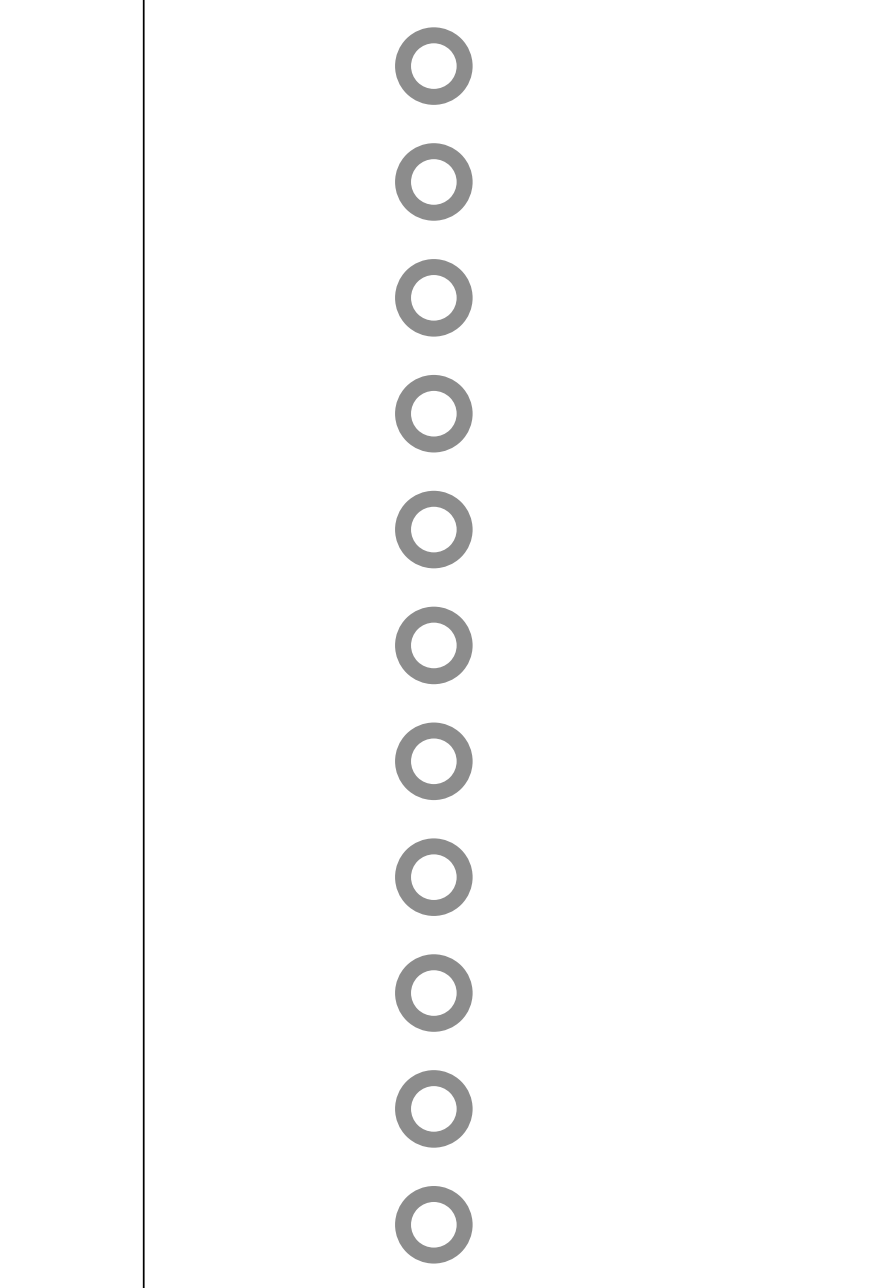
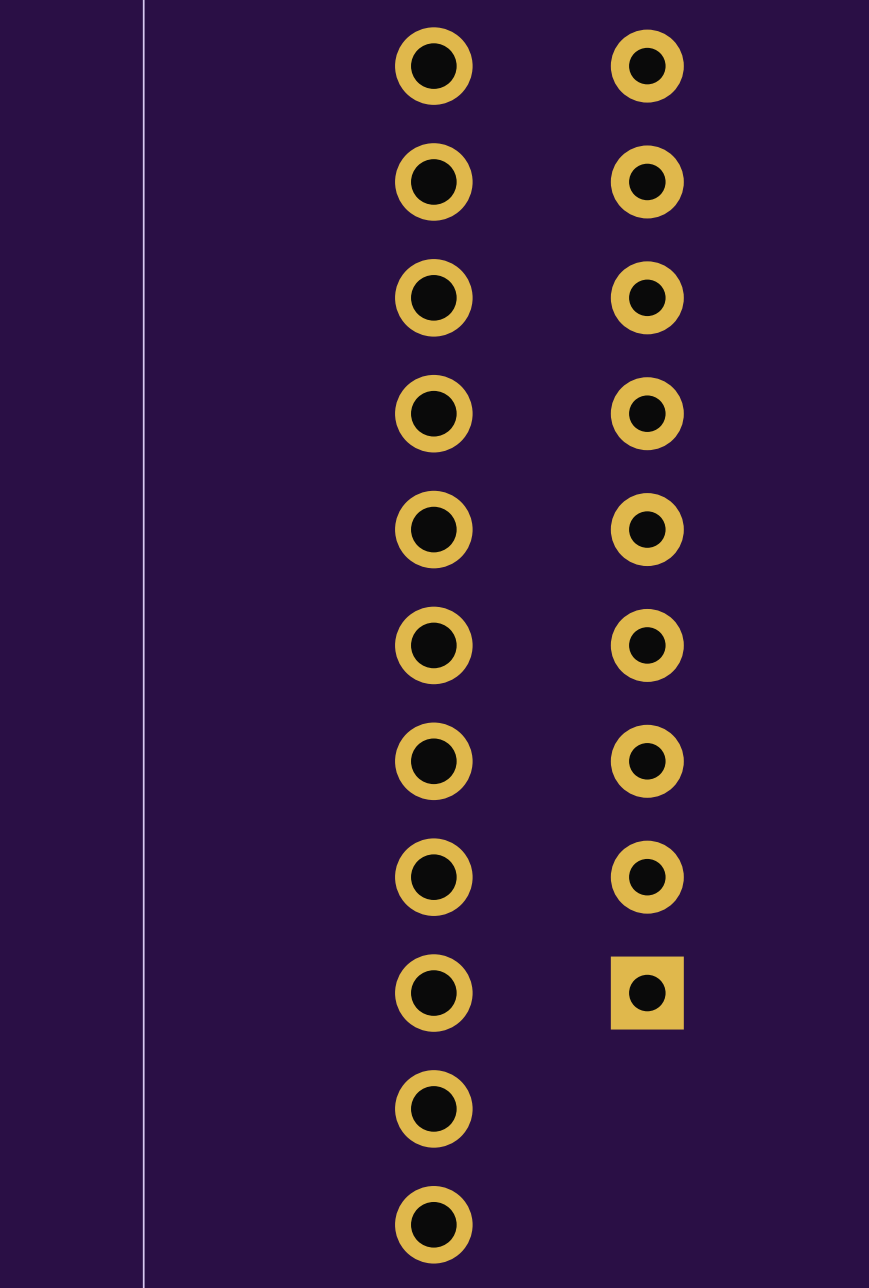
part: none -> (647, 529)

